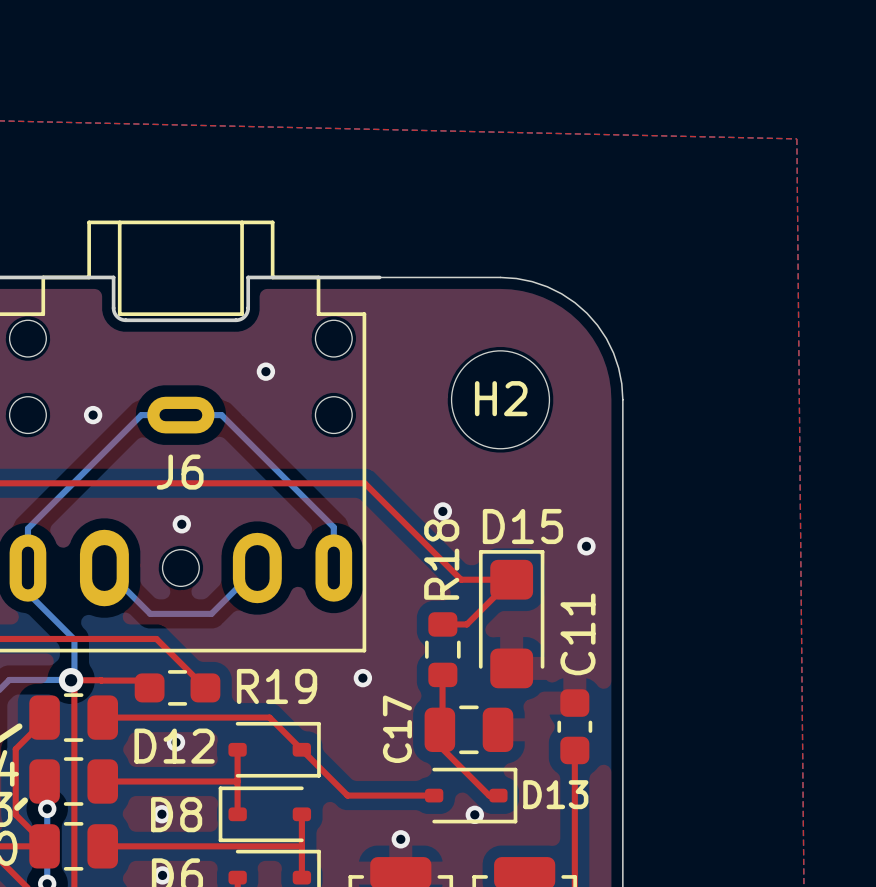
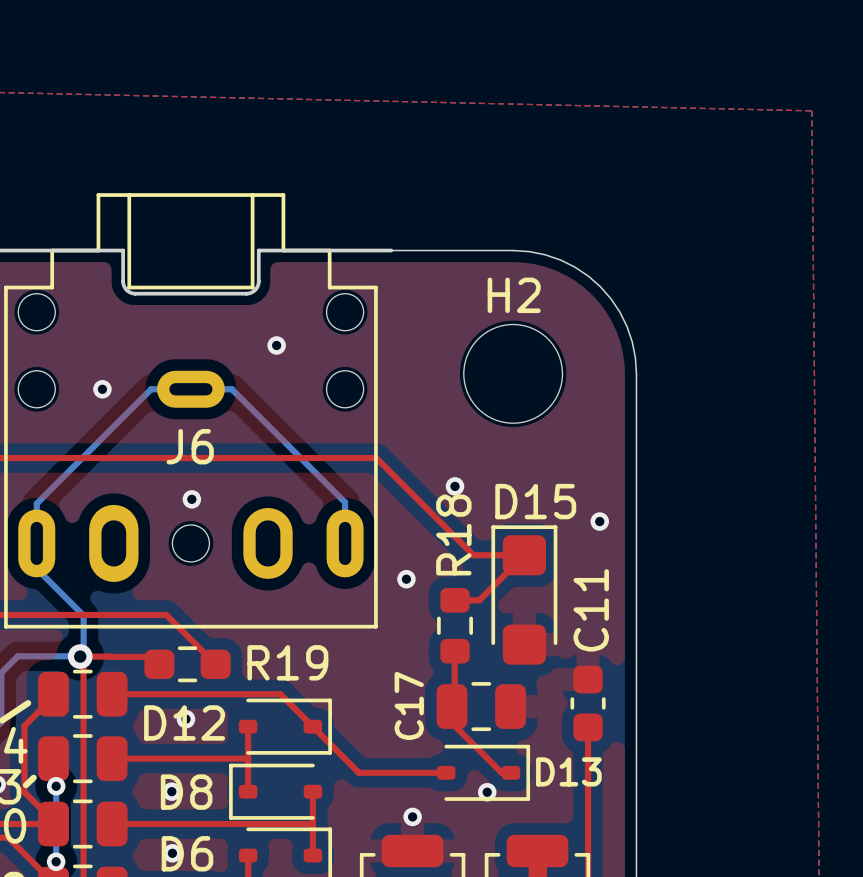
H2 name position: H2 (501, 398) -> H2 (514, 295)
bottom track: (104, 568) (150, 613) (211, 613) (257, 568) -> none
via position: (362, 678) -> (406, 579)

